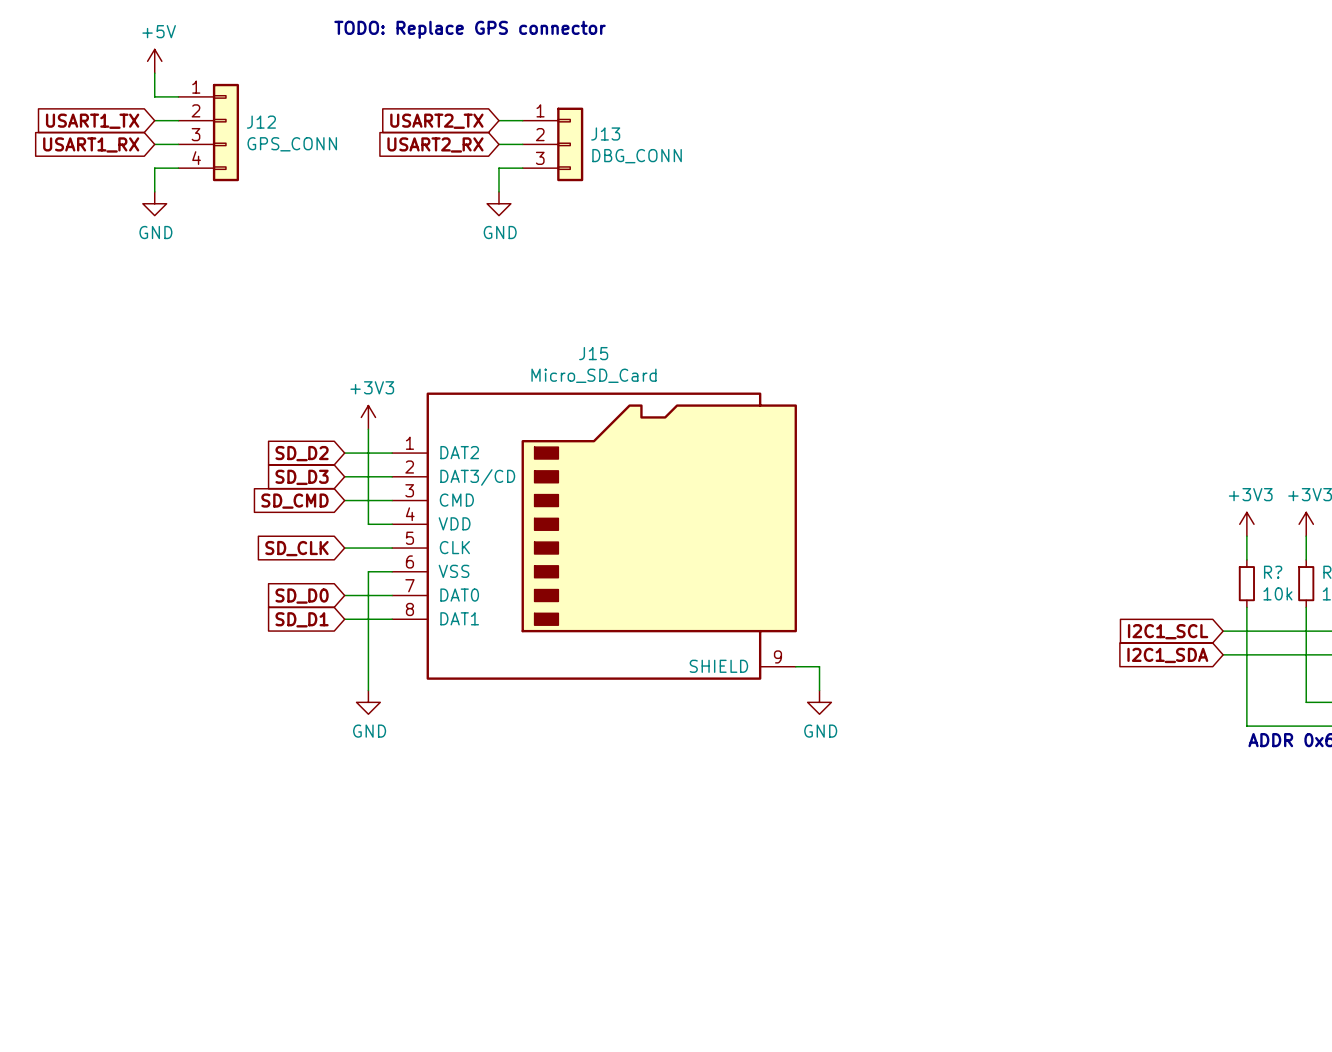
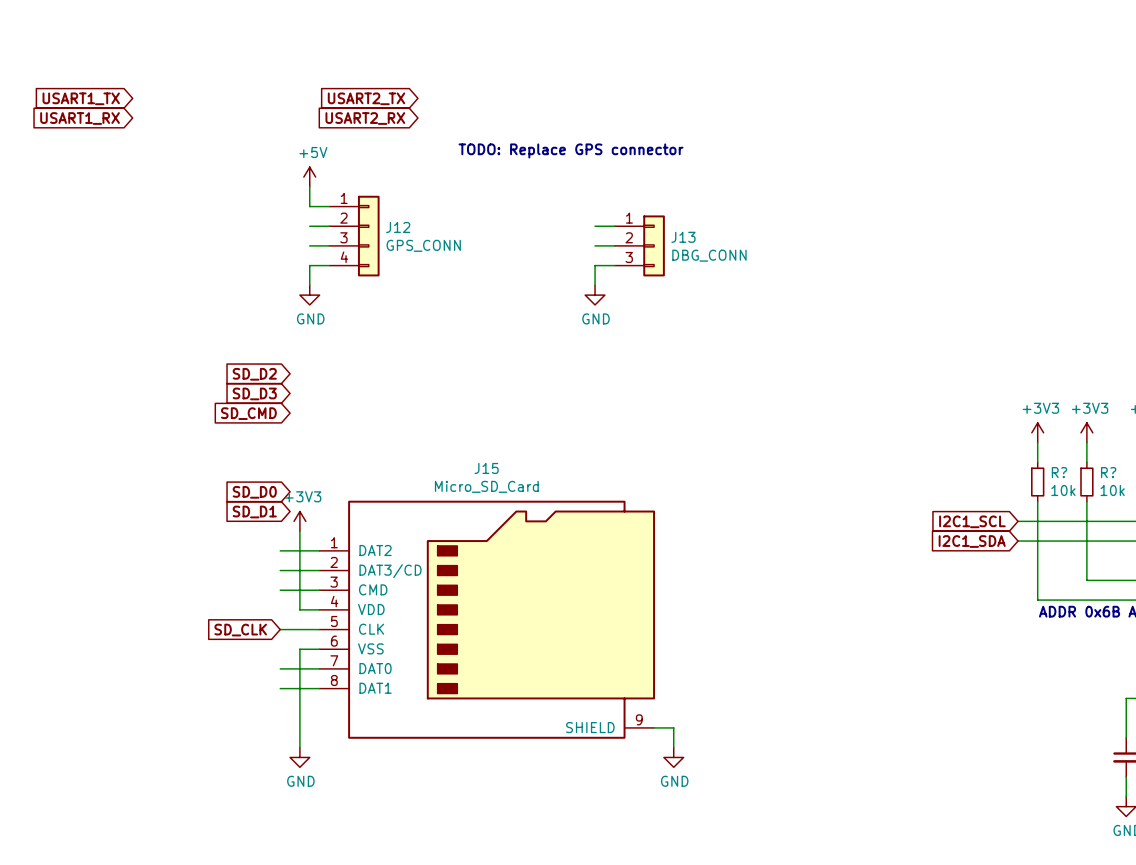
text: TODO: Replace GPS connector (470, 29) -> none
power symbol: +5V (154, 61) -> none
wire: (154, 73) (154, 96) (178, 96) -> none
wire: (154, 120) (178, 120) -> none
wire: (498, 120) (522, 120) -> (309, 226) (329, 226)
J12 position: (208, 132) -> (354, 236)
wire: (154, 144) (178, 144) -> none
wire: (498, 144) (522, 144) -> (309, 245) (329, 245)
J13 position: (553, 144) -> (639, 245)
wire: (178, 168) (154, 168) (154, 191) -> none
wire: (522, 168) (498, 168) (498, 191) -> (329, 265) (309, 265) (309, 285)
text: none -> TODO: Replace GPS connector (571, 150)
power symbol: GND (154, 203) -> none
power symbol: GND (498, 203) -> none
power symbol: none -> +5V (309, 177)
wire: none -> (309, 186) (309, 206) (329, 206)
wire: none -> (595, 226) (614, 226)
wire: none -> (595, 245) (614, 245)
wire: none -> (614, 265) (595, 265) (595, 285)
power symbol: none -> GND (309, 295)
power symbol: none -> GND (595, 295)
power symbol position: +3V3 (368, 417) -> +3V3 (299, 521)
wire: (368, 429) (368, 524) (392, 524) -> (299, 531) (299, 609) (319, 609)
wire: (344, 453) (392, 453) -> (280, 550) (319, 550)
wire: (344, 476) (392, 476) -> (280, 570) (319, 570)
wire: (344, 500) (392, 500) -> (280, 590) (319, 590)
J15 position: (594, 536) -> (487, 619)
global label position: SD_CLK (296, 548) -> SD_CLK (240, 630)
wire: (344, 548) (392, 548) -> (280, 629) (319, 629)
wire: (392, 571) (368, 571) (368, 690) -> (319, 649) (299, 649) (299, 747)
wire: (344, 595) (392, 595) -> (280, 668) (319, 668)
wire: (344, 619) (392, 619) -> (280, 688) (319, 688)
wire: (795, 666) (819, 666) (819, 690) -> (654, 727) (673, 727) (673, 747)
power symbol: GND (368, 702) -> none
power symbol: GND (819, 702) -> none
power symbol: none -> GND (299, 757)
power symbol: none -> GND (673, 757)

